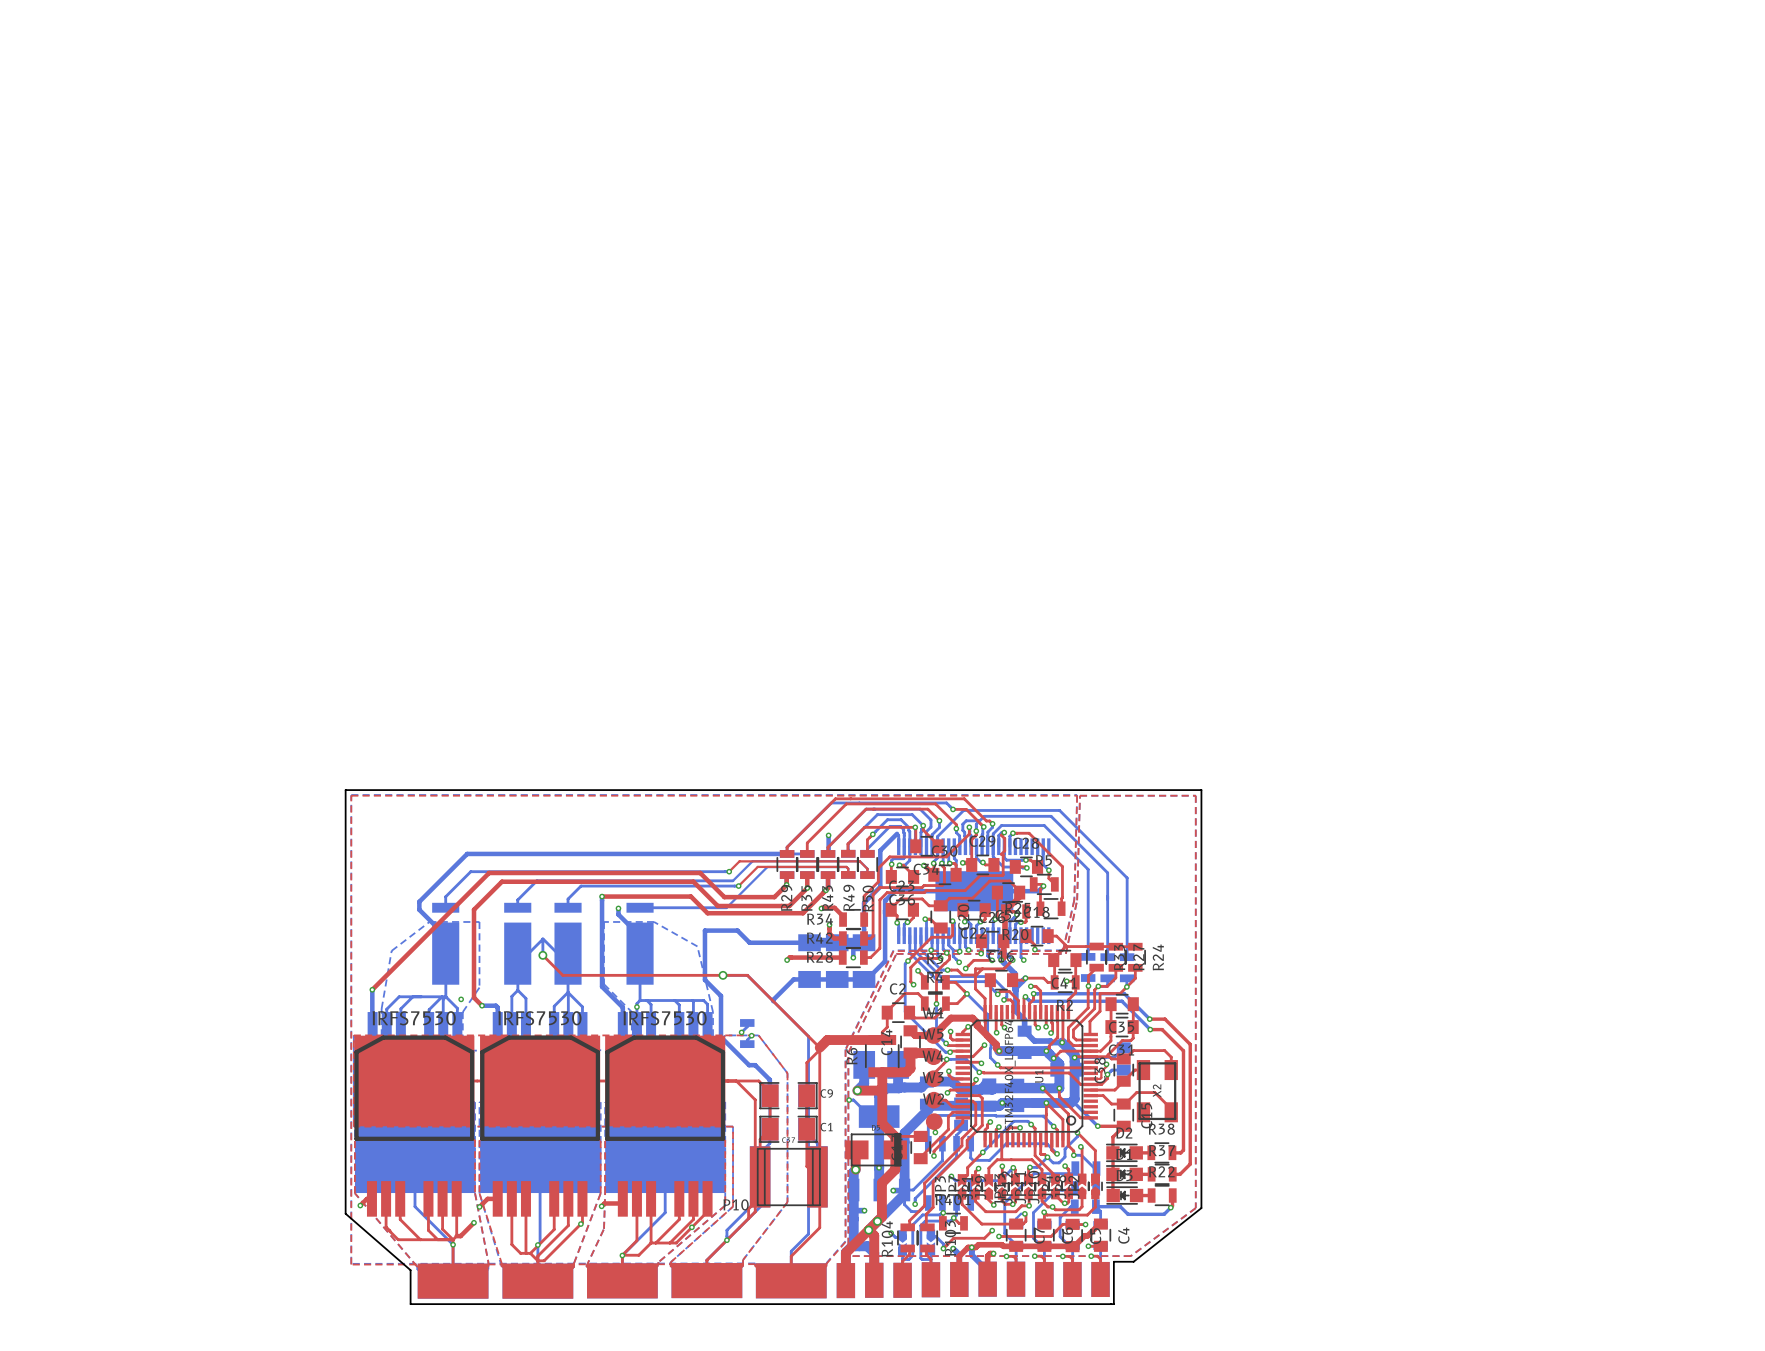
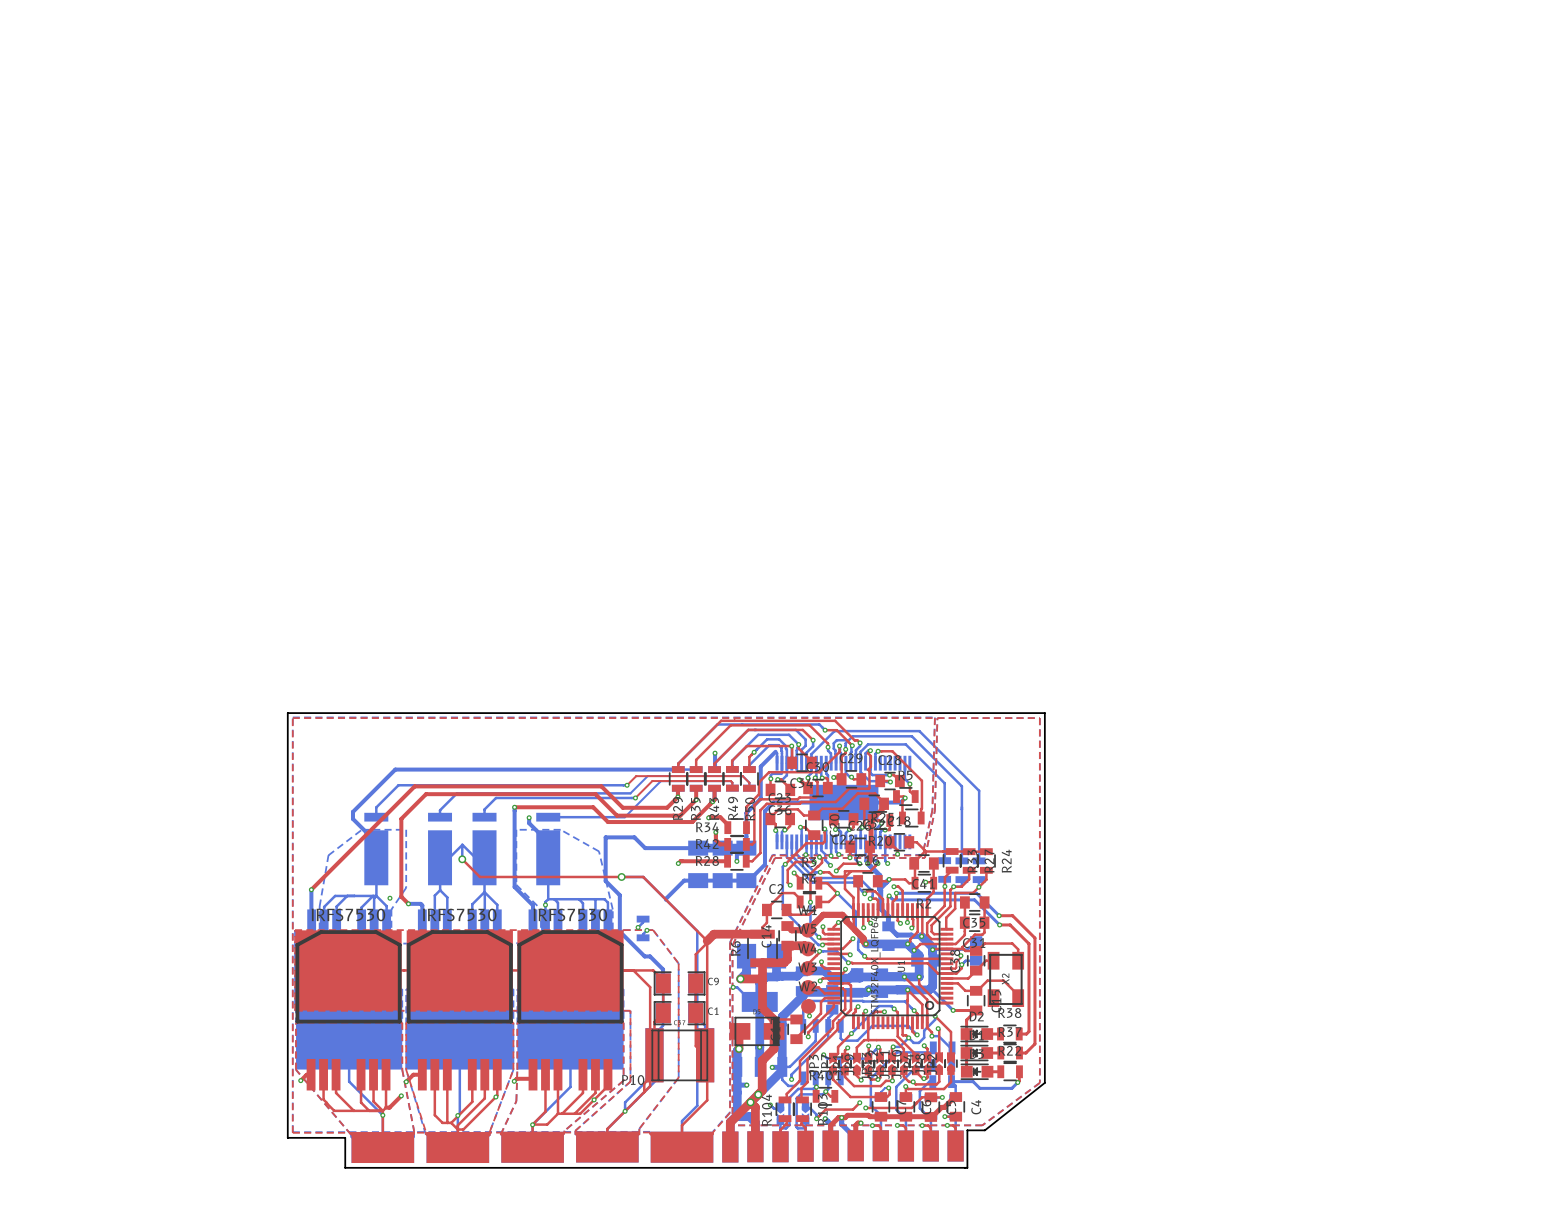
board edge: (345, 1213) (410, 1270) -> (287, 1087) (287, 1137) (345, 1137)

